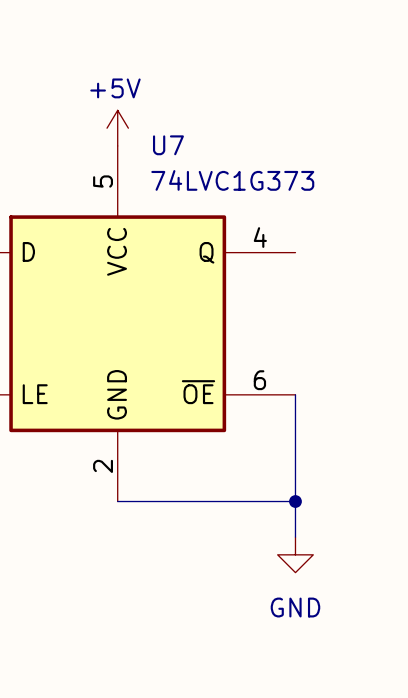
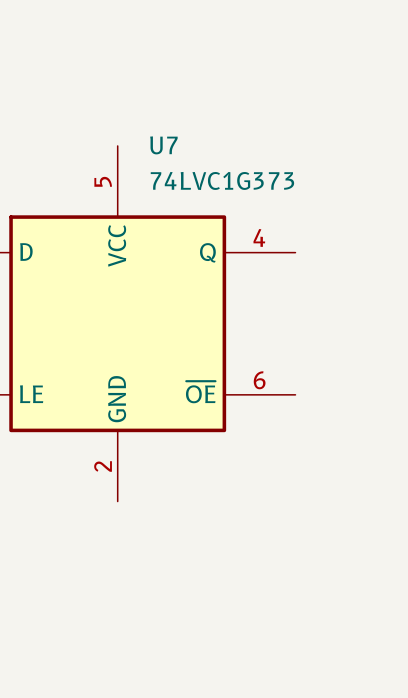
power symbol: +5V (117, 128) -> none
wire: (295, 394) (295, 537) -> none
wire: (117, 501) (295, 501) -> none
junction: (295, 501) -> none
power symbol: GND (295, 554) -> none

